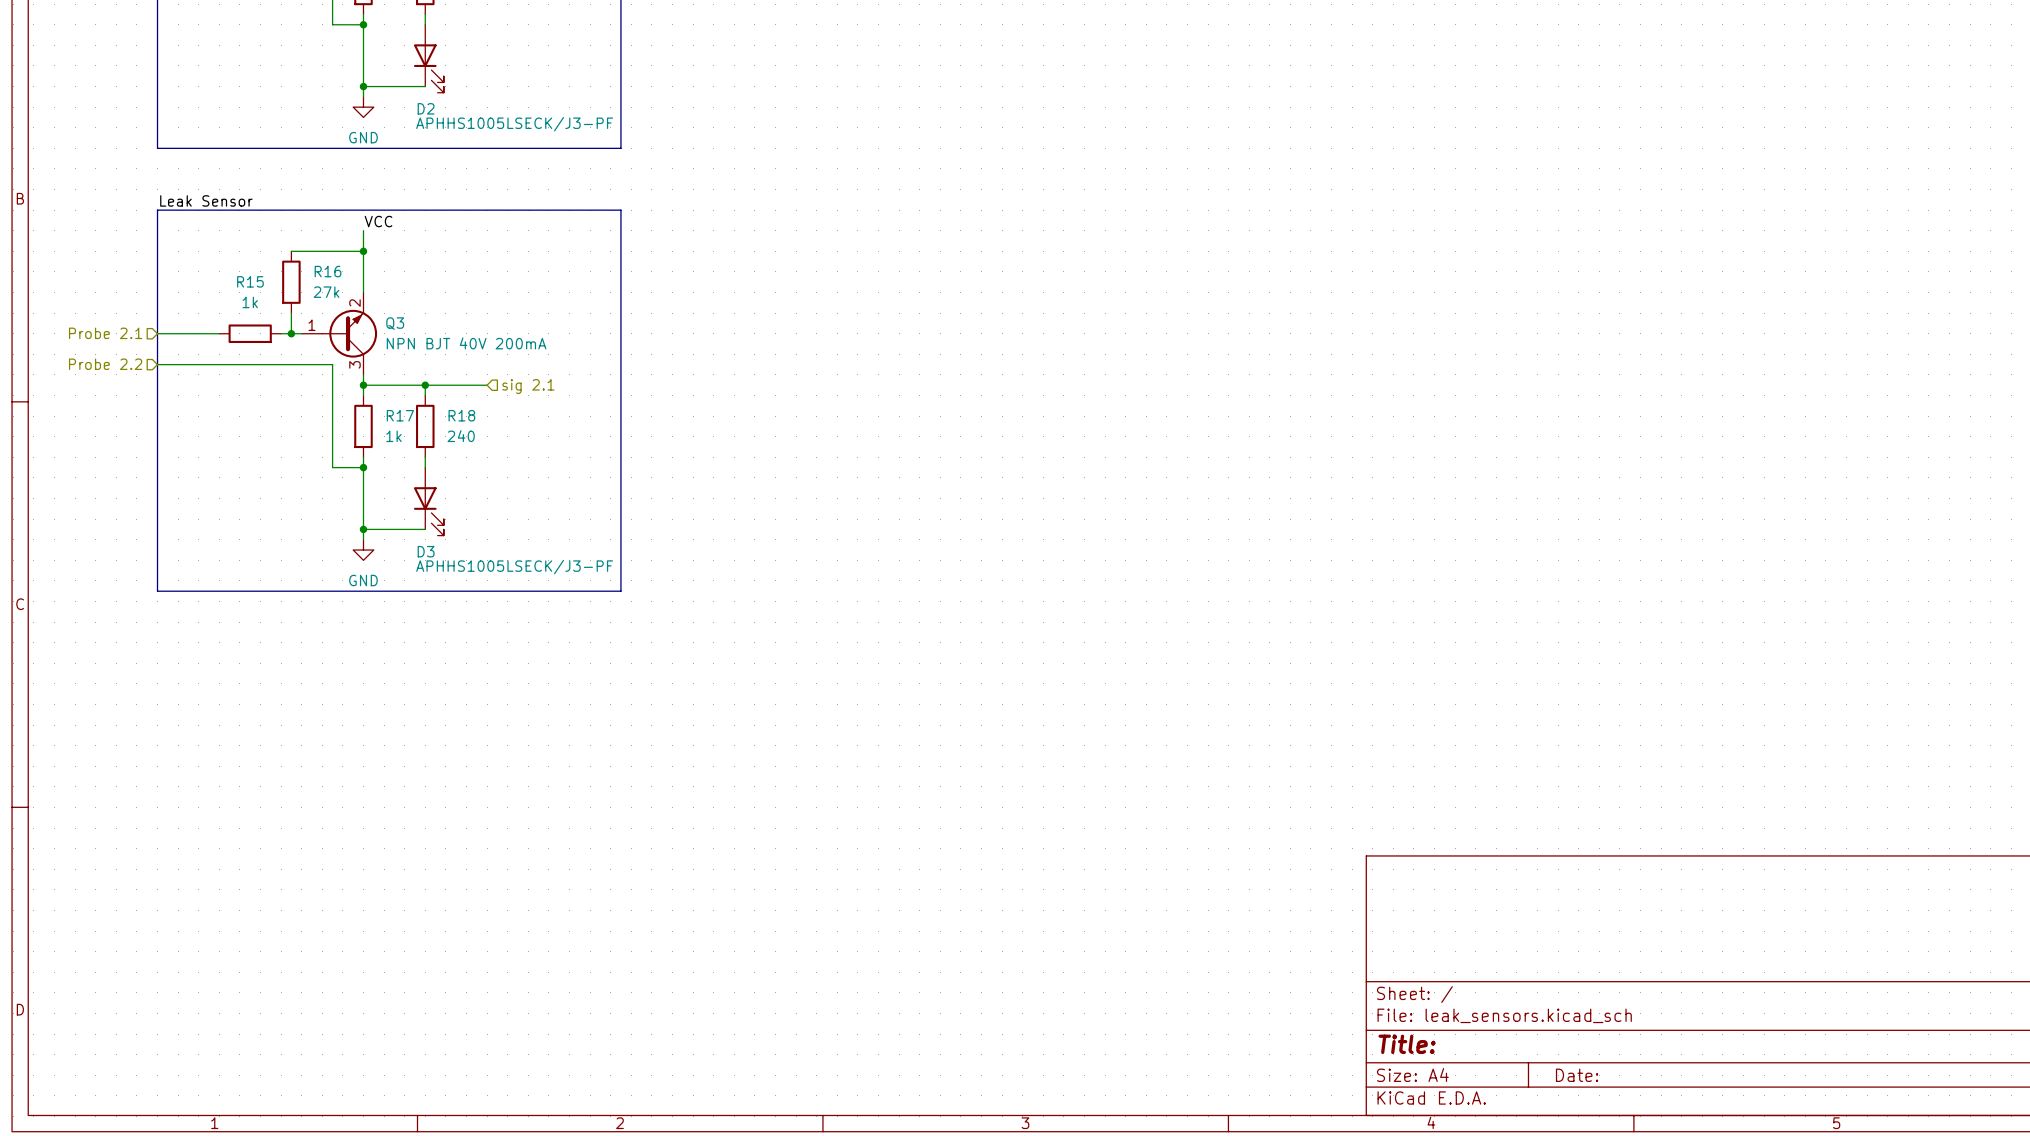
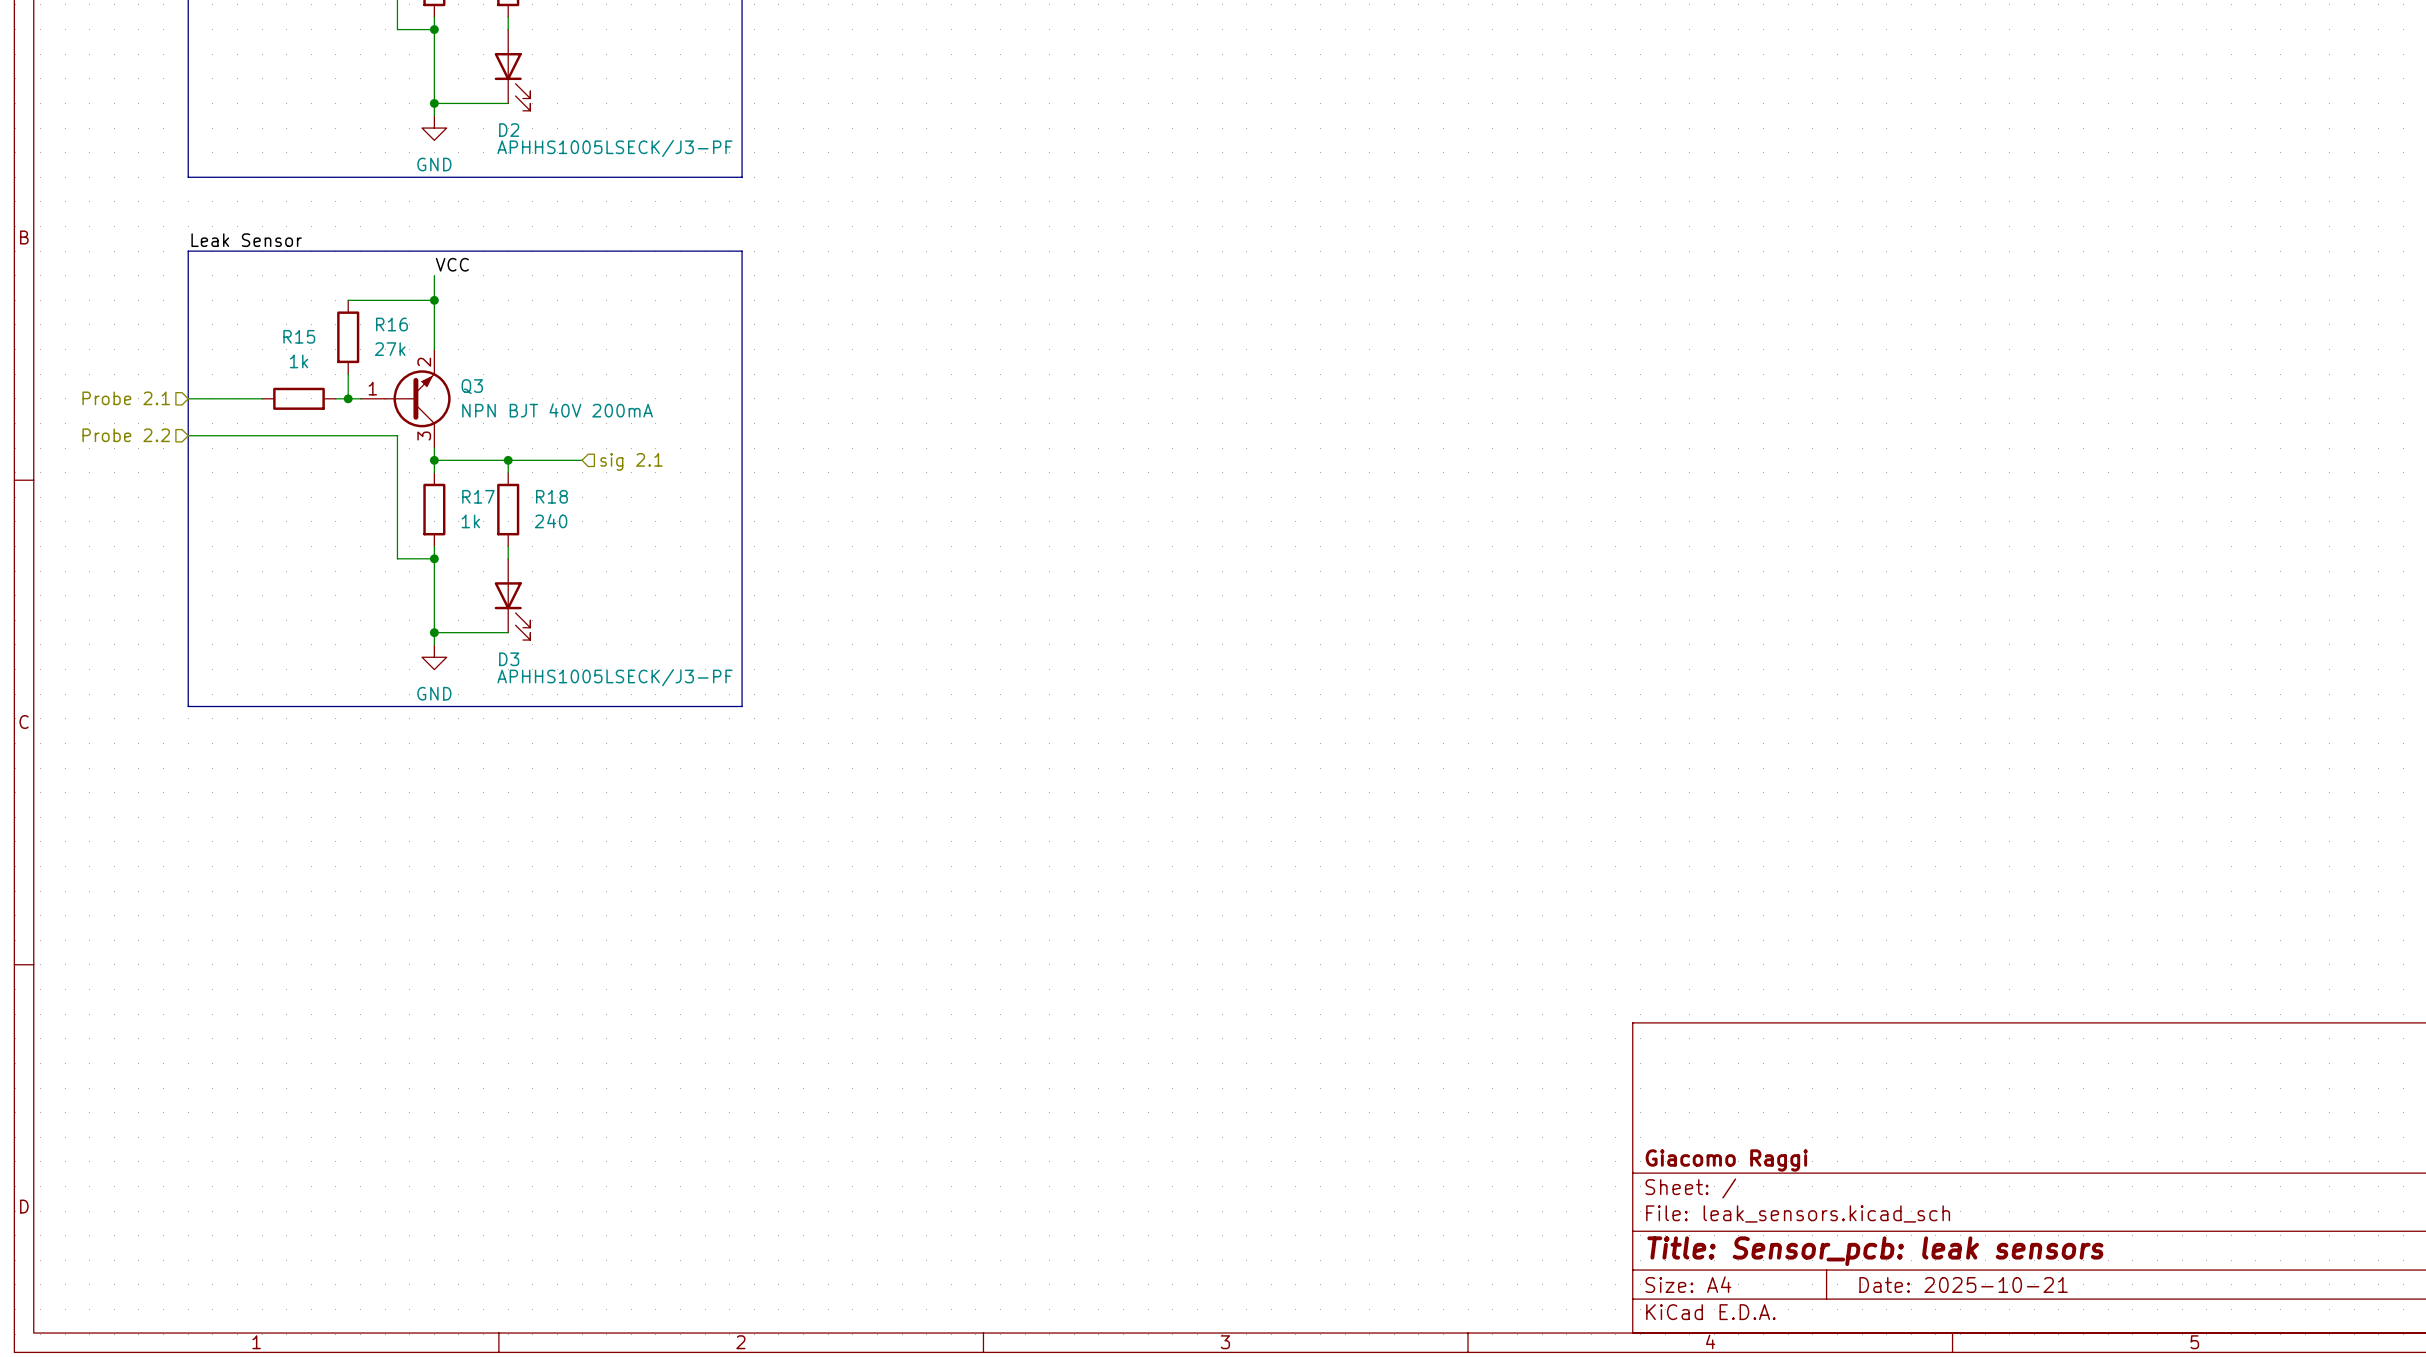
title block: none -> Giacomo Raggi (1726, 1160)
title block: Title: (1407, 1044) -> Title: Sensor_pcb: leak sensors (1875, 1251)
title block: Date: (1577, 1075) -> Date: 2025-10-21 (1963, 1284)

